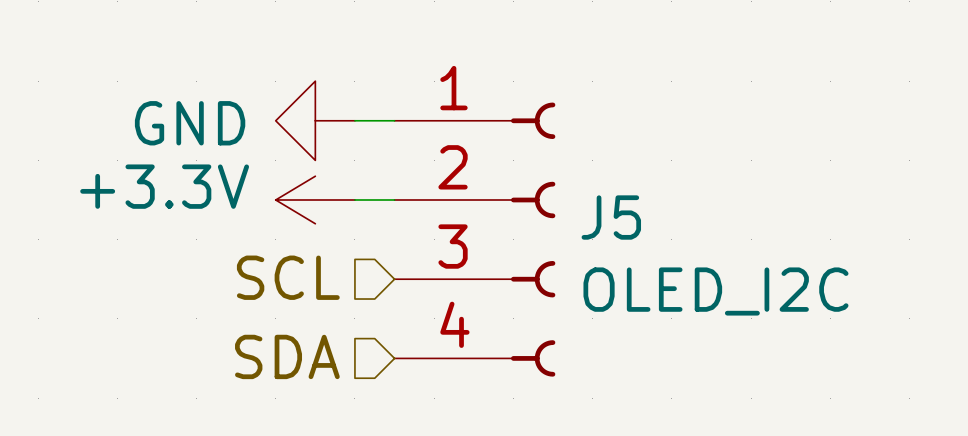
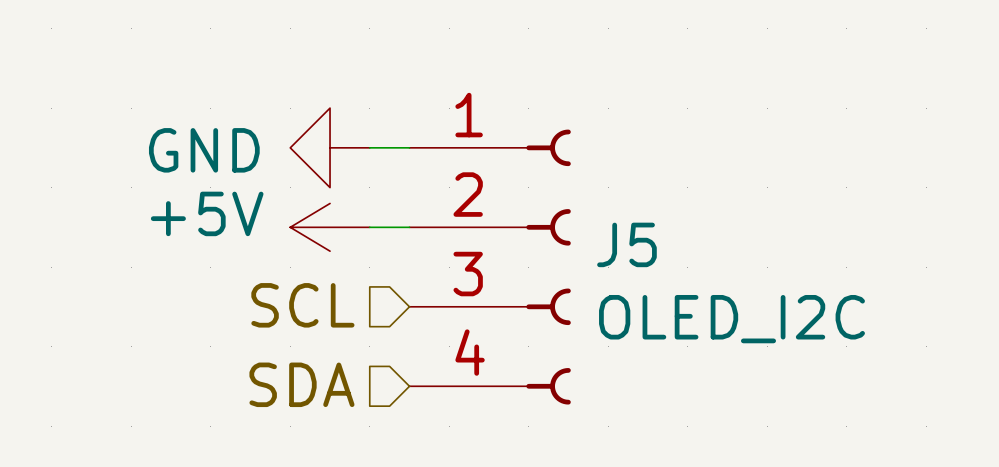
power symbol: +3.3V (315, 199) -> +5V (330, 227)

